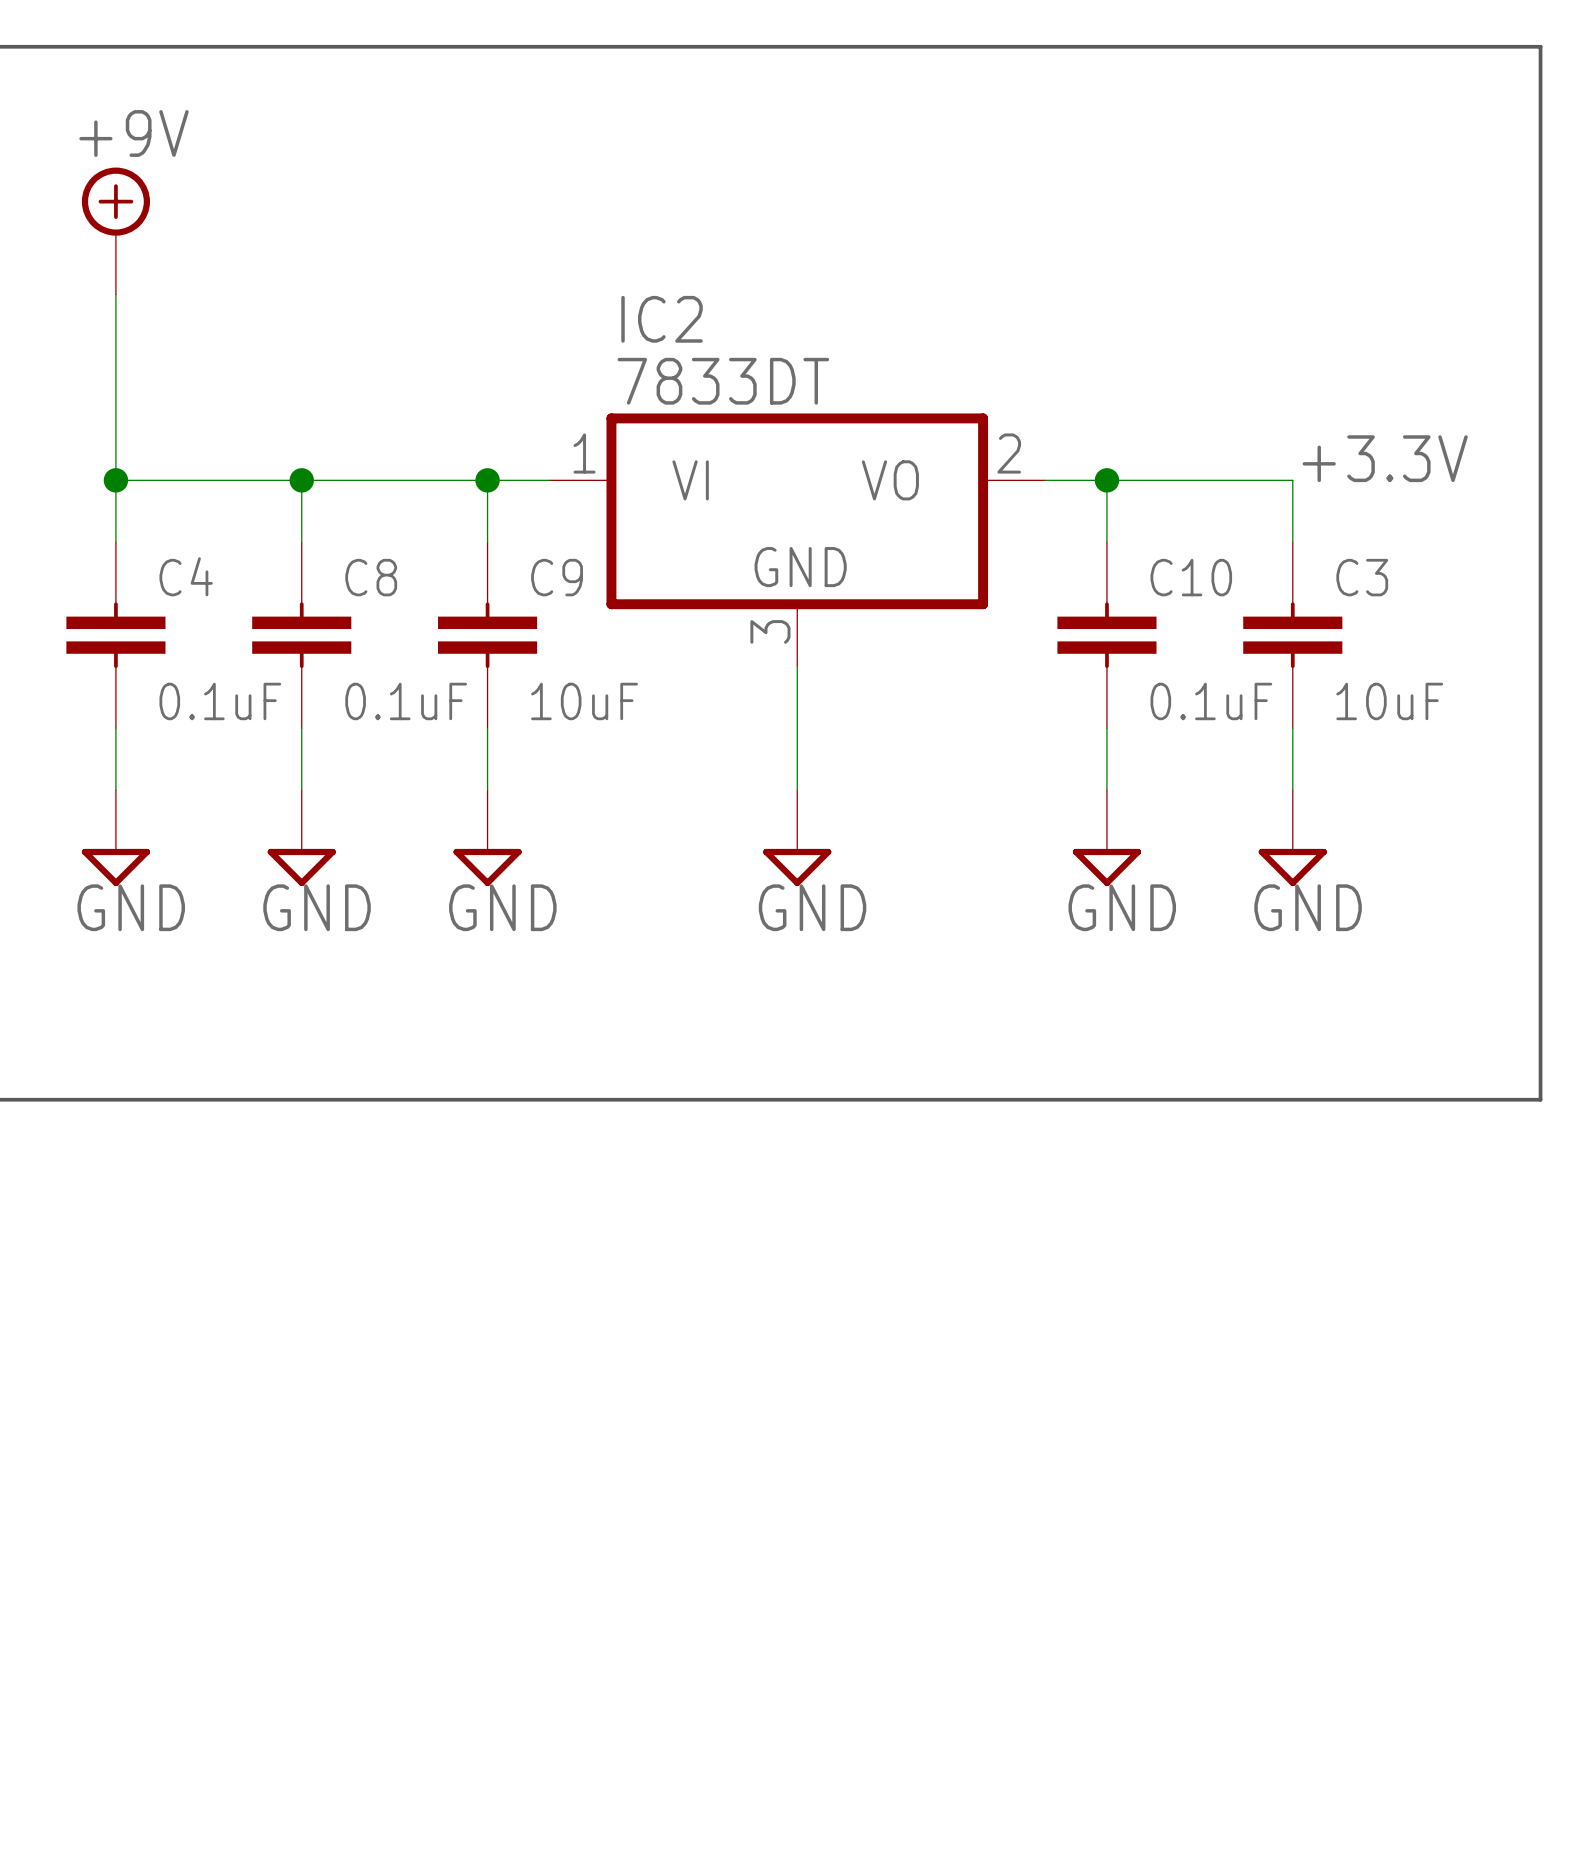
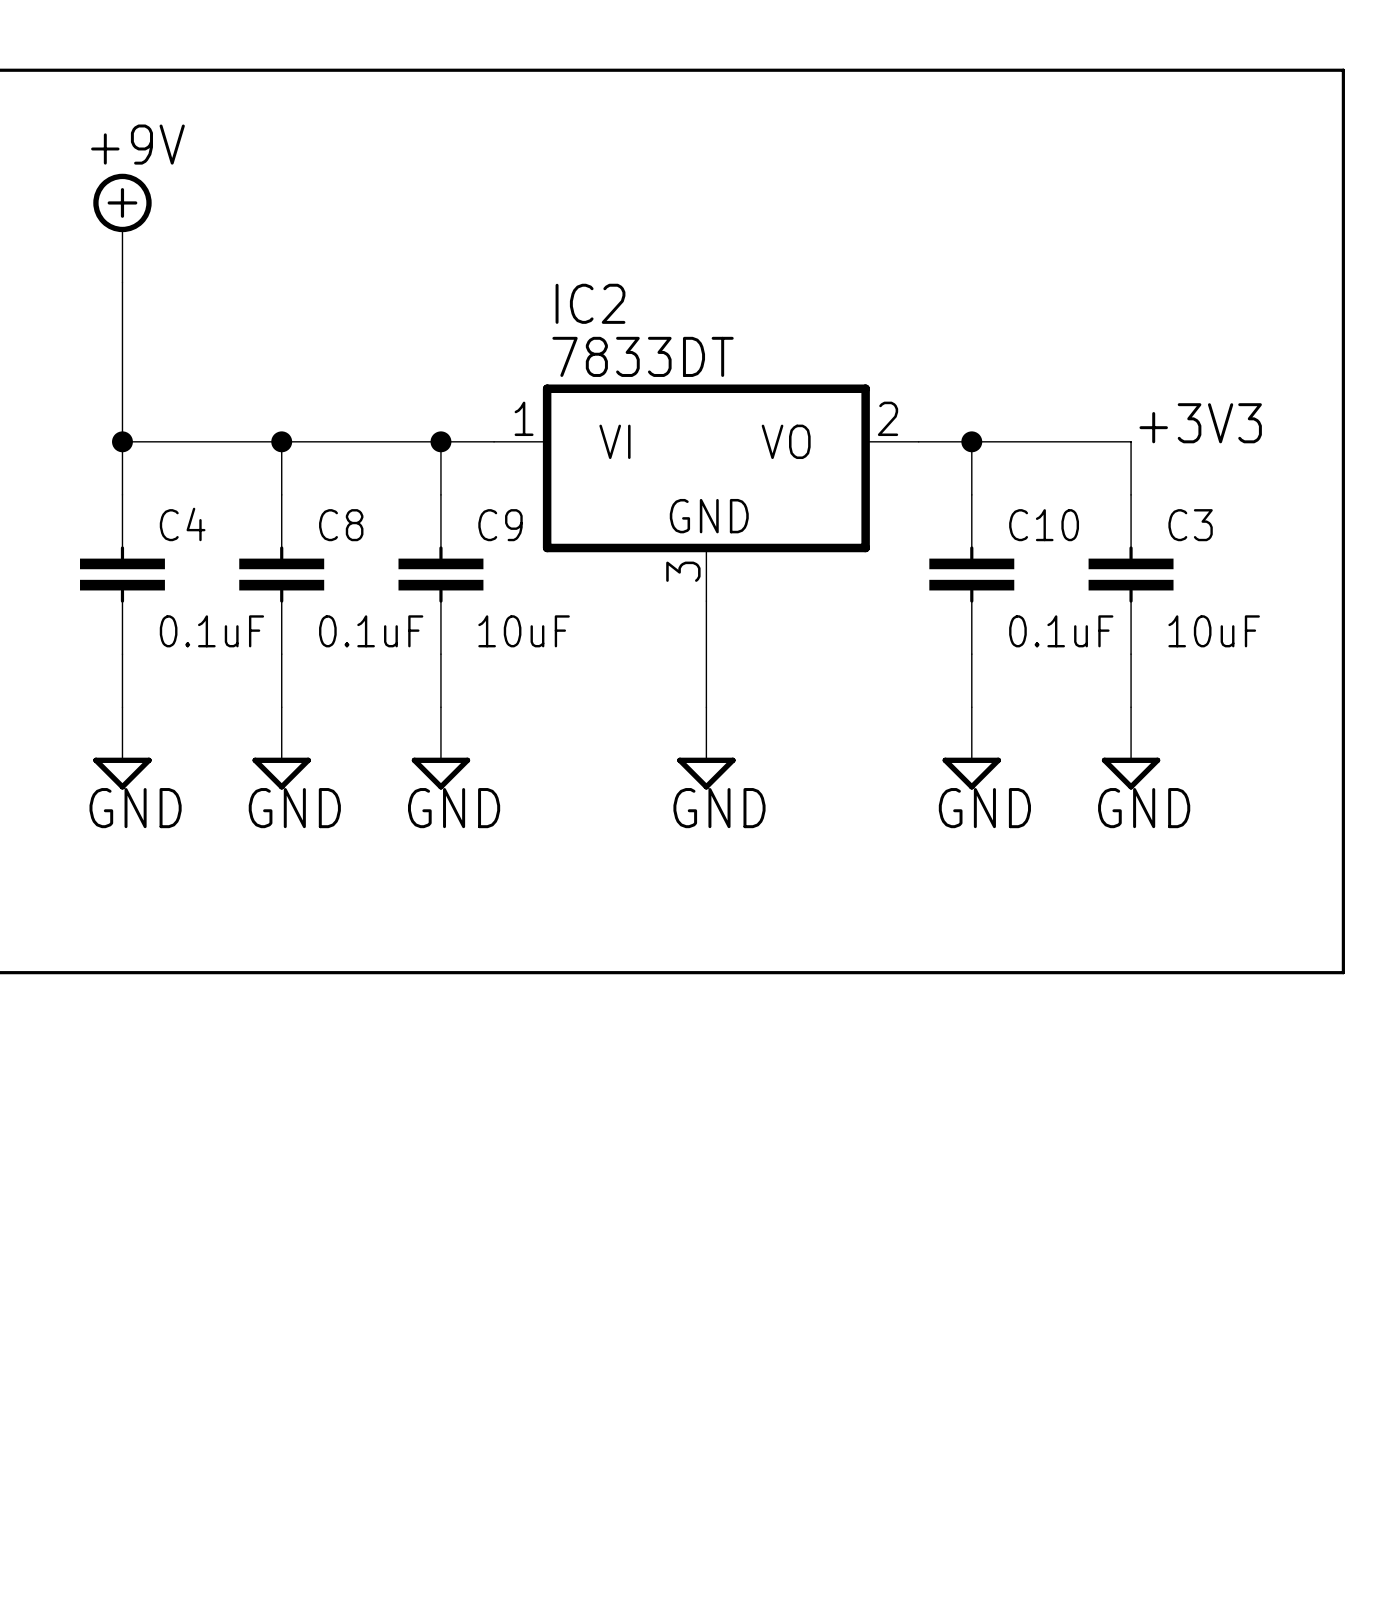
label: +3.3V (1385, 458) -> +3V3 (1200, 423)

